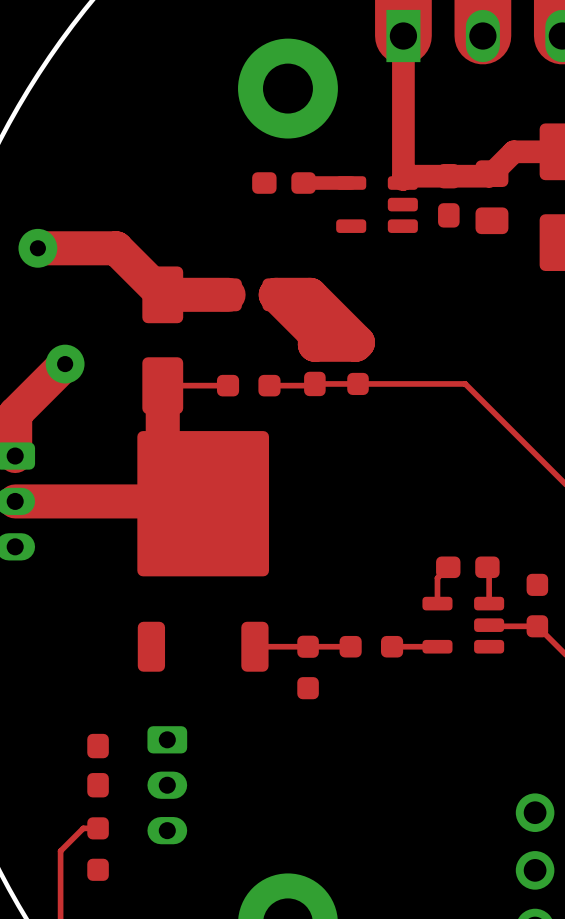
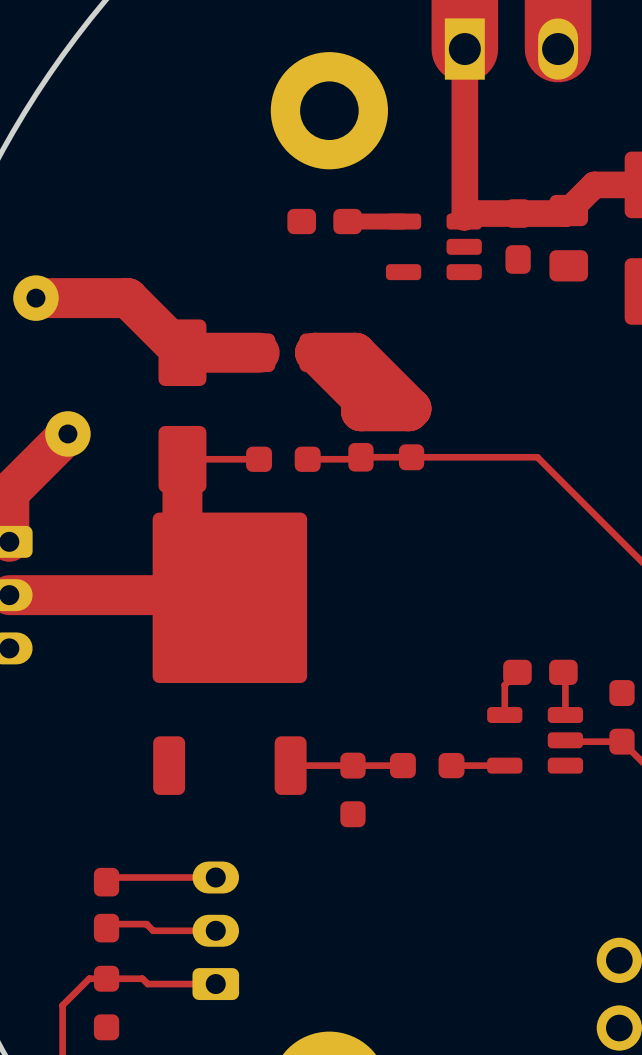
top track: none -> (215, 877) (107, 877)
top track: none -> (106, 924) (146, 924) (153, 930) (215, 930)
part rotation: 0° (167, 785) -> 180° (215, 930)
top track: none -> (106, 978) (142, 978) (147, 984) (215, 984)

